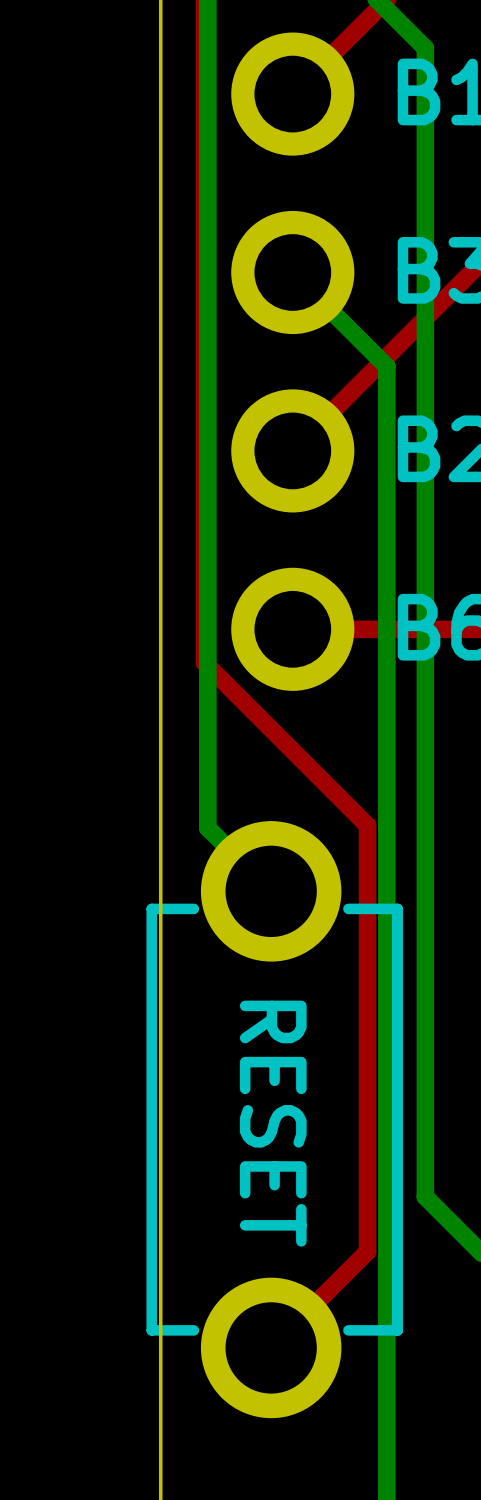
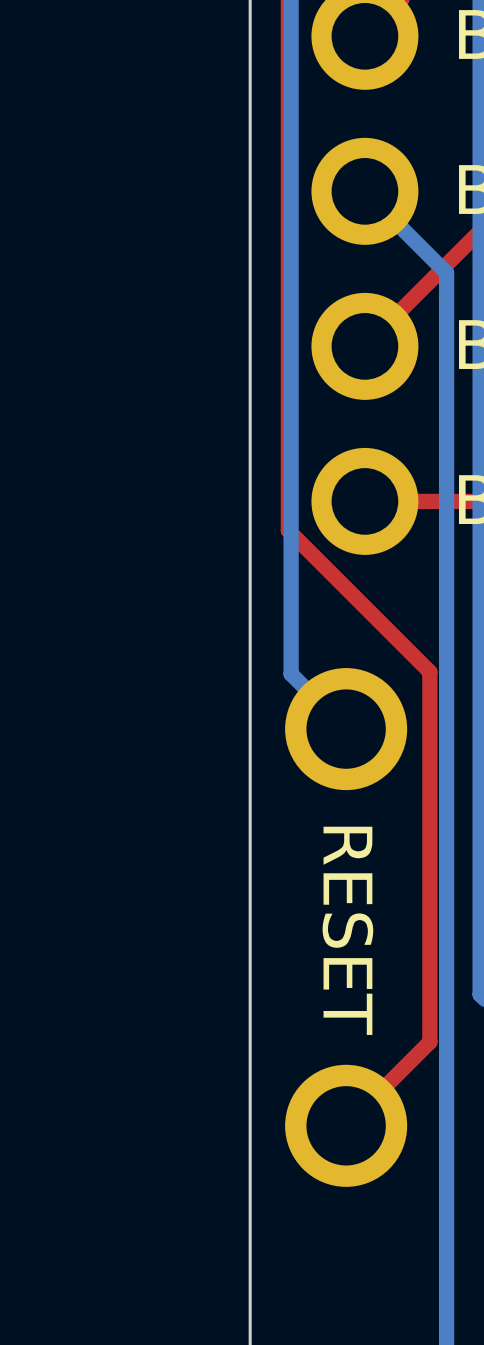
part footprint: [146, 821, 403, 1419] -> [285, 668, 408, 1187]

